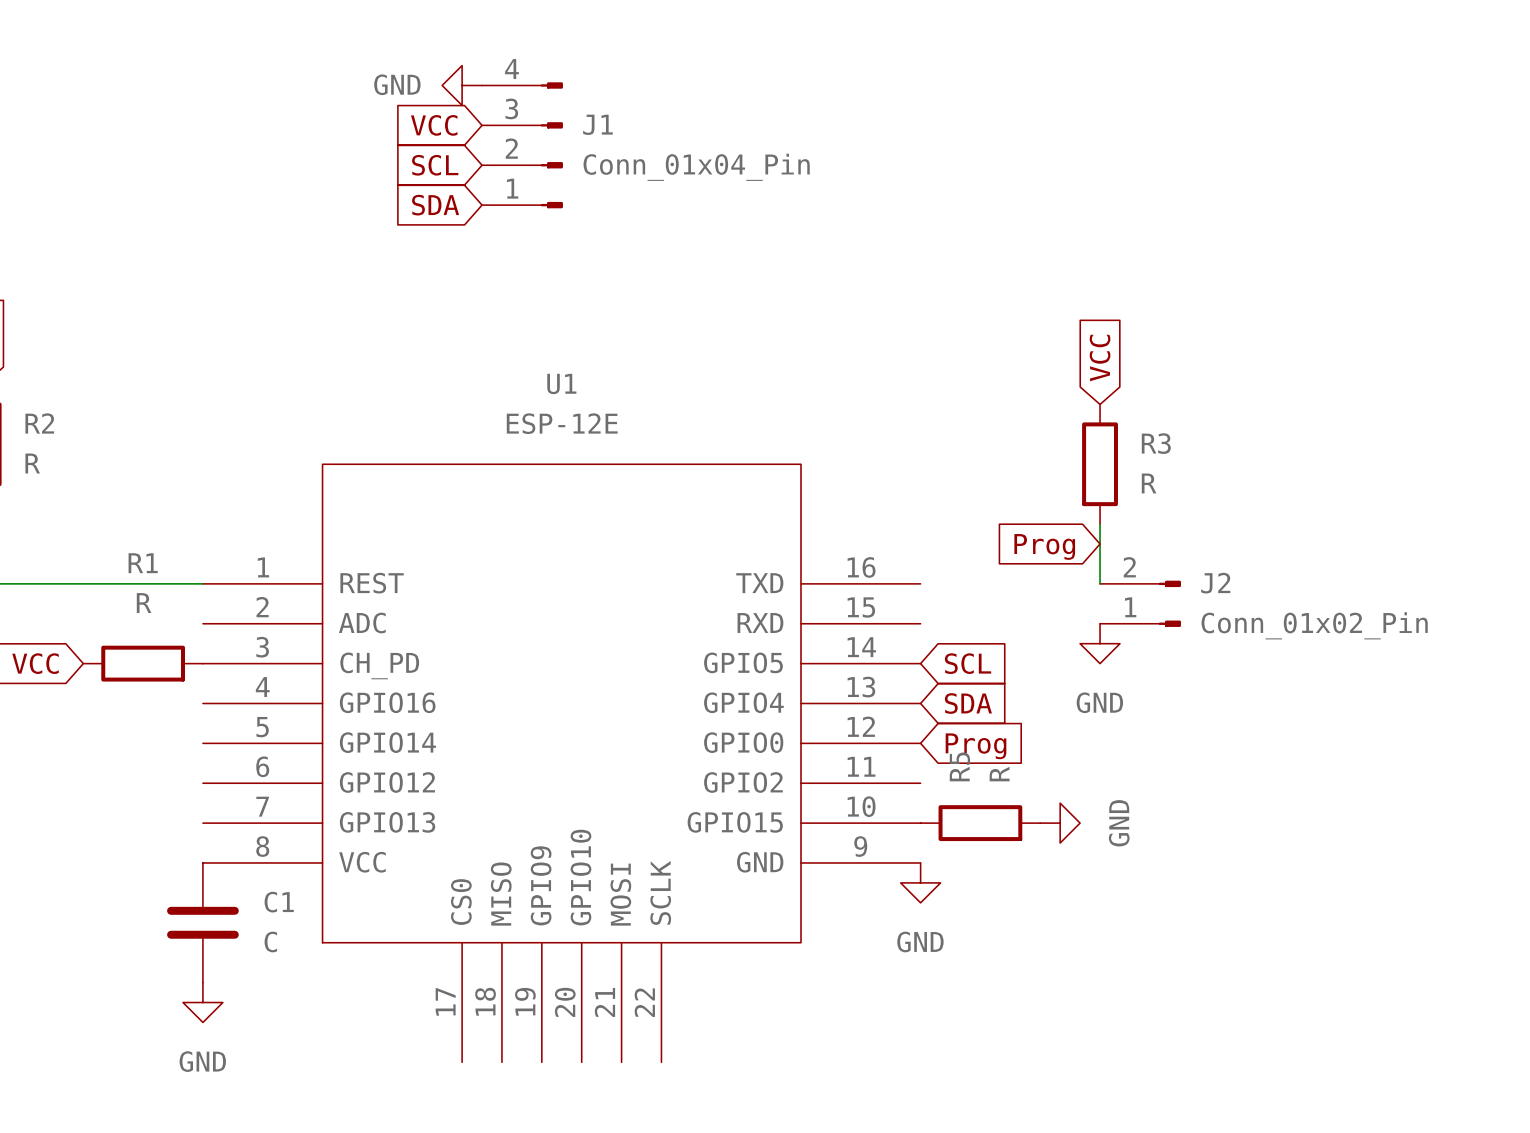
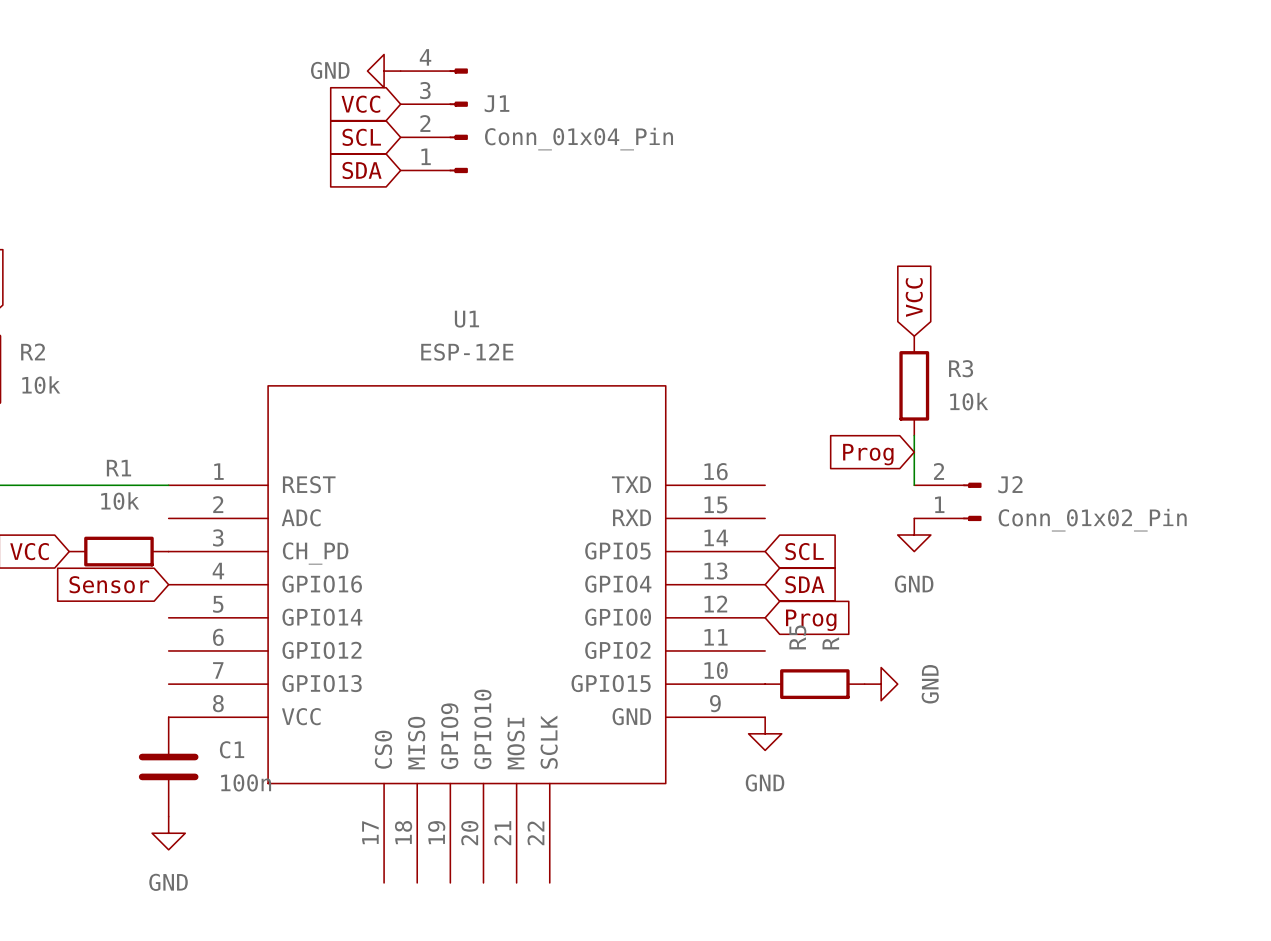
R2 value: R (32, 463) -> 10k (41, 385)
R3 value: R (1149, 483) -> 10k (969, 401)
R1 value: R (144, 603) -> 10k (120, 501)
global label: none -> Sensor (109, 584)
C1 value: C (270, 941) -> 100n (246, 782)

